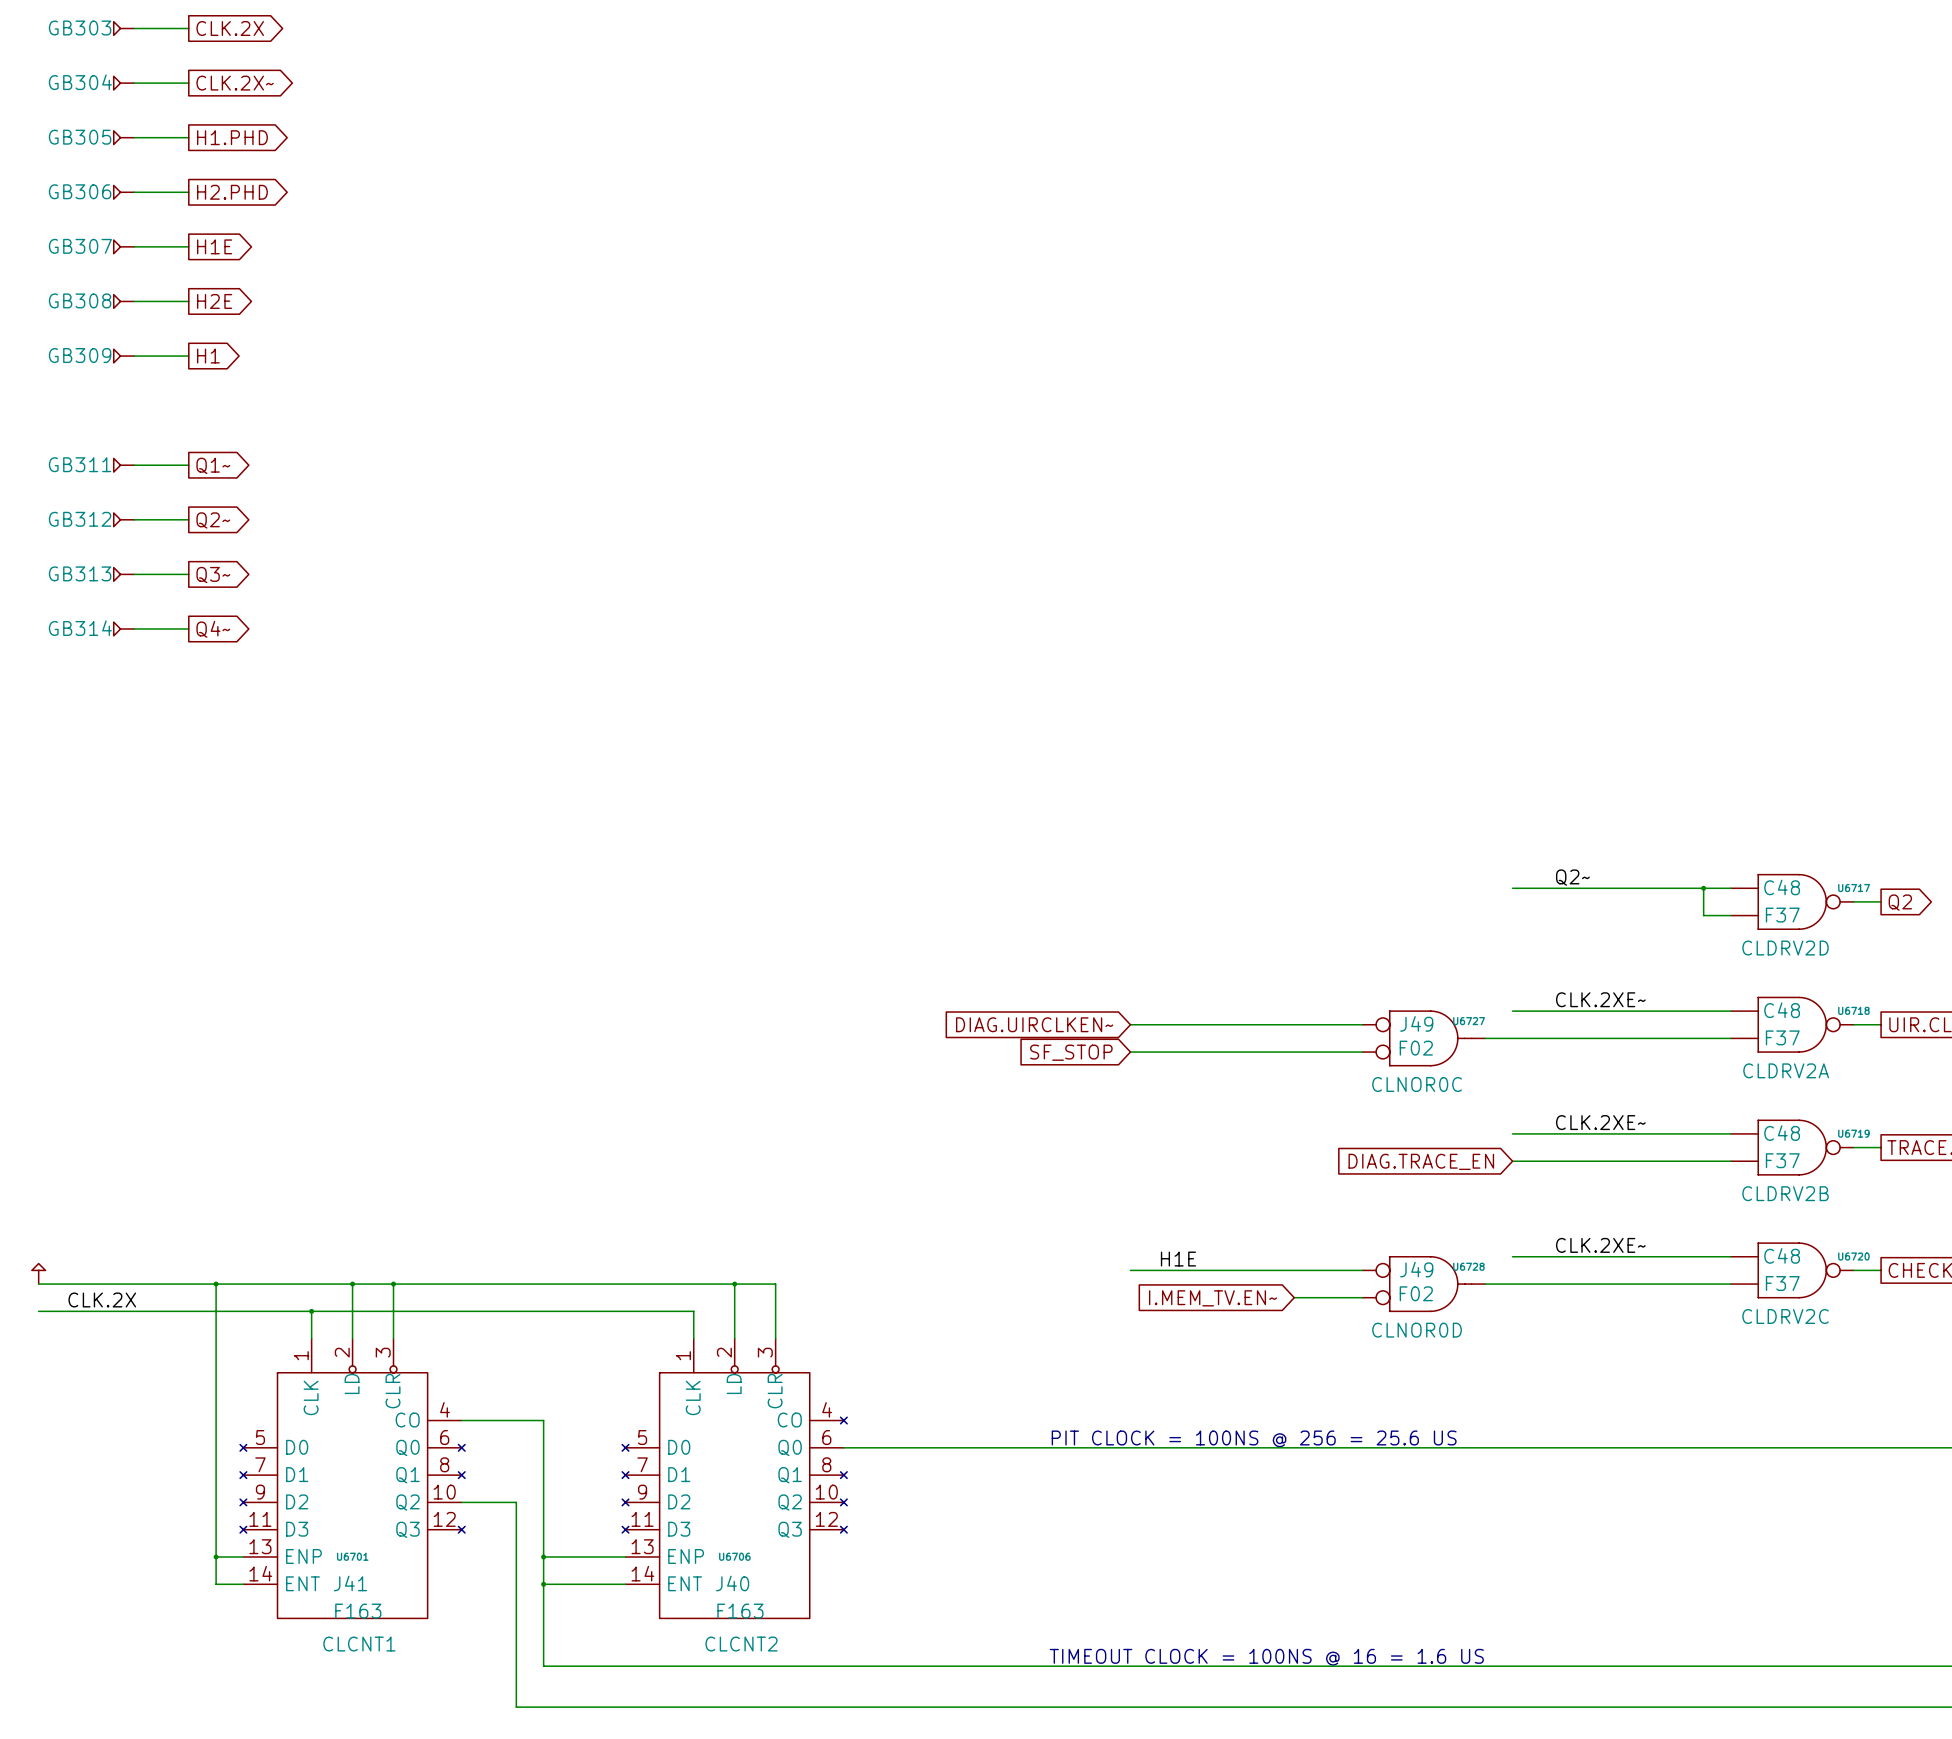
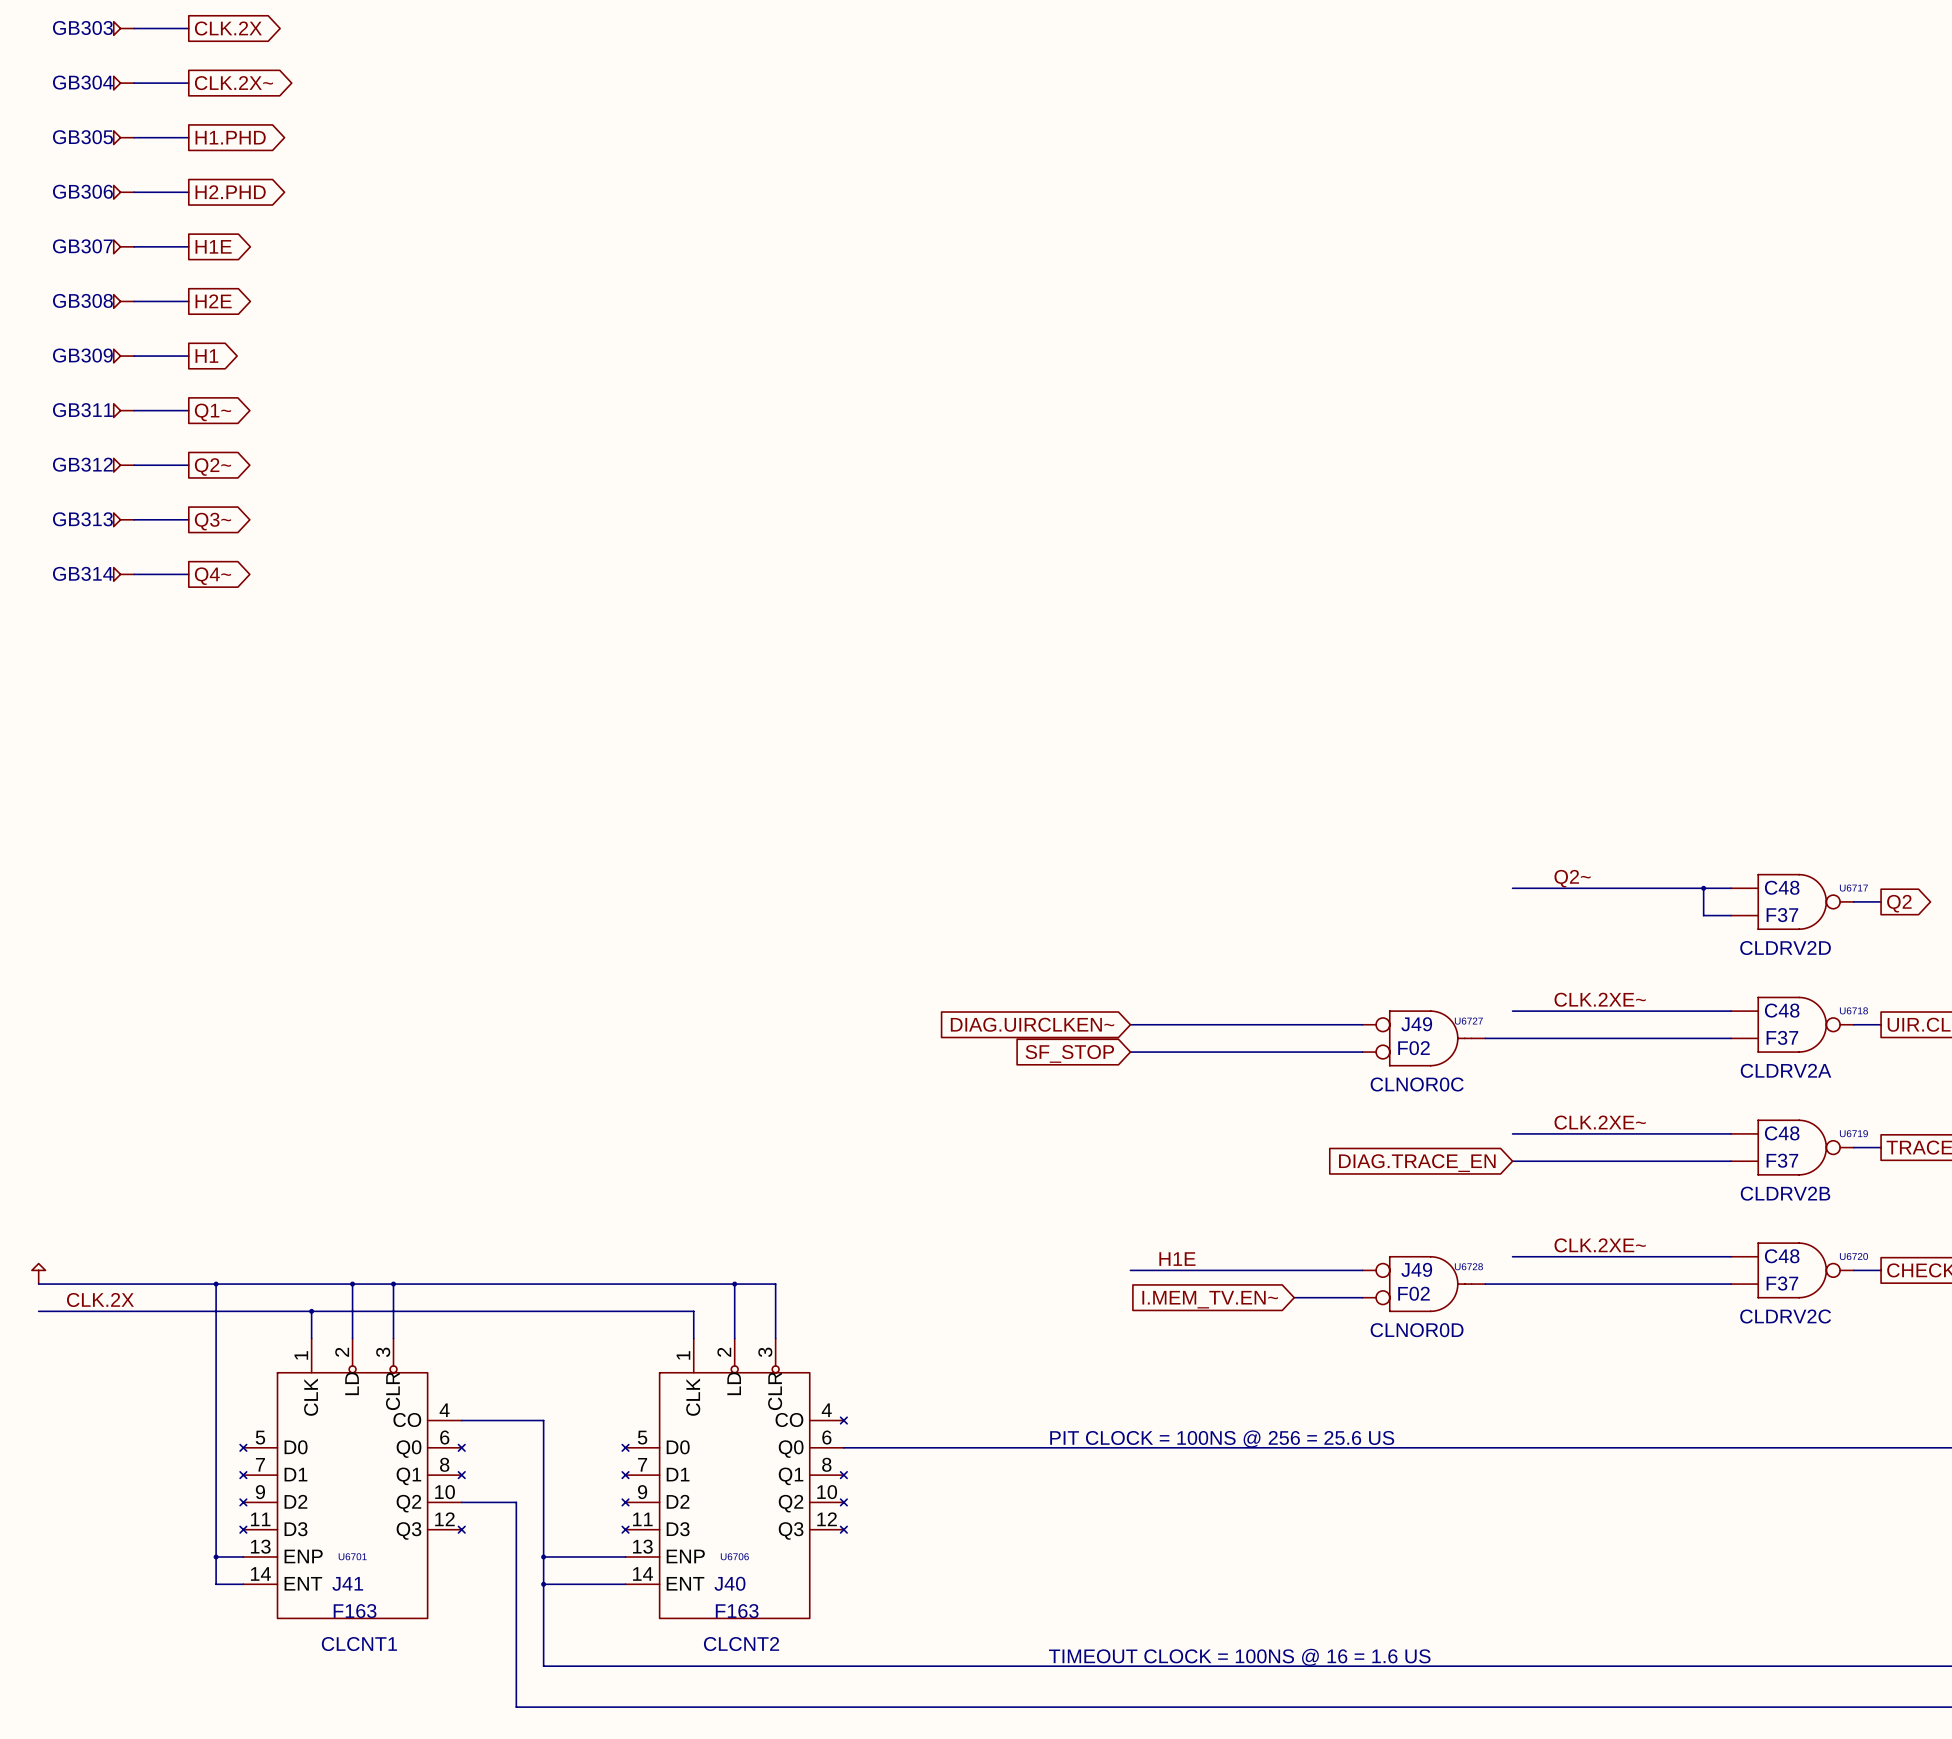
GB311: none -> (123, 410)
wire: none -> (134, 410) (188, 410)
global label: none -> Q1~ (212, 412)
GB311 name: GB311 (80, 464) -> GB312 (82, 464)
global label: Q1~ (213, 465) -> Q2~ (212, 466)
GB312 name: GB312 (80, 519) -> GB313 (82, 519)
global label: Q2~ (213, 520) -> Q3~ (212, 521)
GB313 name: GB313 (80, 573) -> GB314 (83, 573)
global label: Q3~ (213, 575) -> Q4~ (212, 576)
GB314: (123, 628) -> none
wire: (134, 628) (188, 628) -> none
global label: Q4~ (213, 629) -> none

